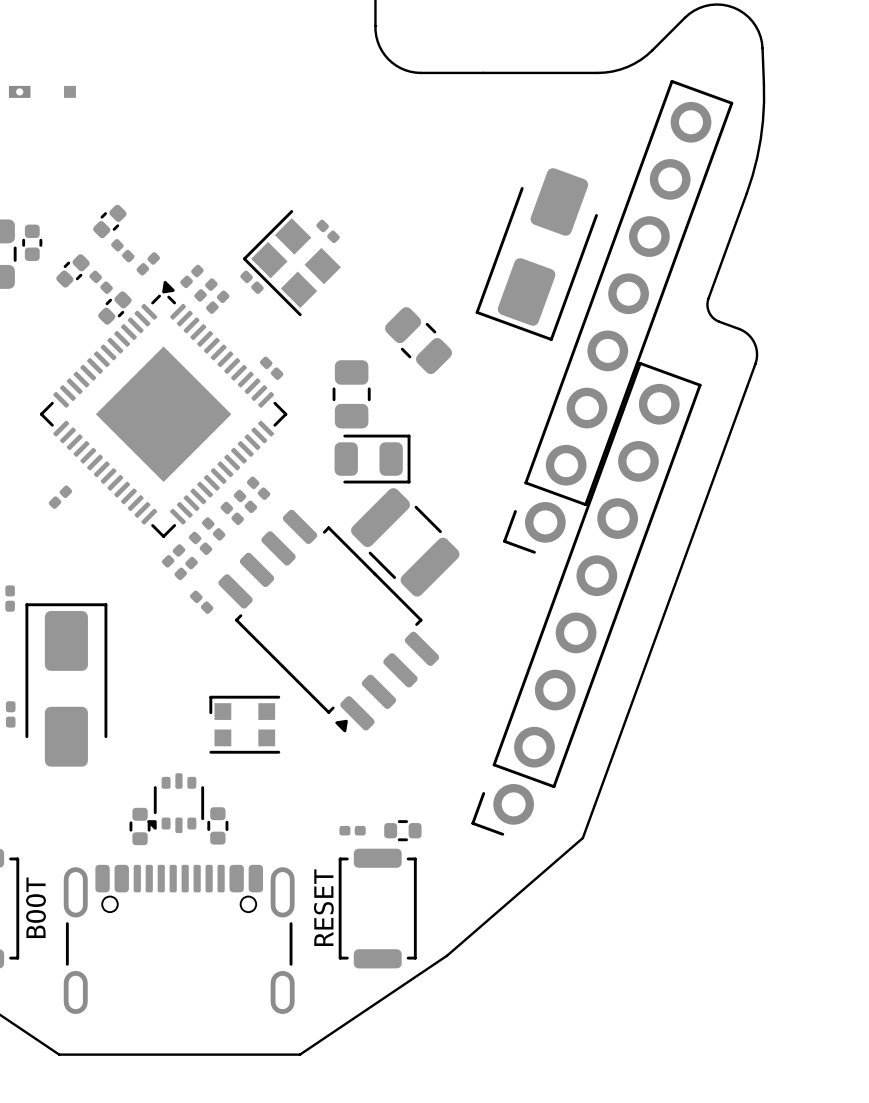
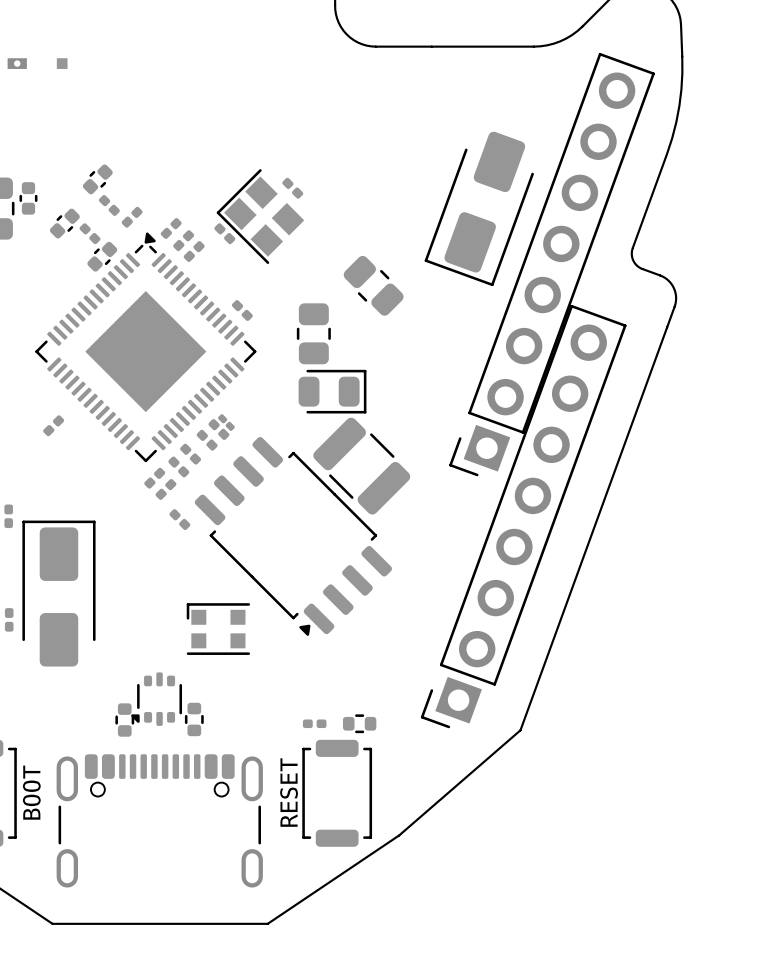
part footprint: [503, 79, 734, 554] -> [449, 52, 655, 477]
part footprint: [471, 361, 702, 836] -> [420, 304, 627, 729]
part footprint: [246, 476, 271, 500] -> [218, 414, 235, 431]

